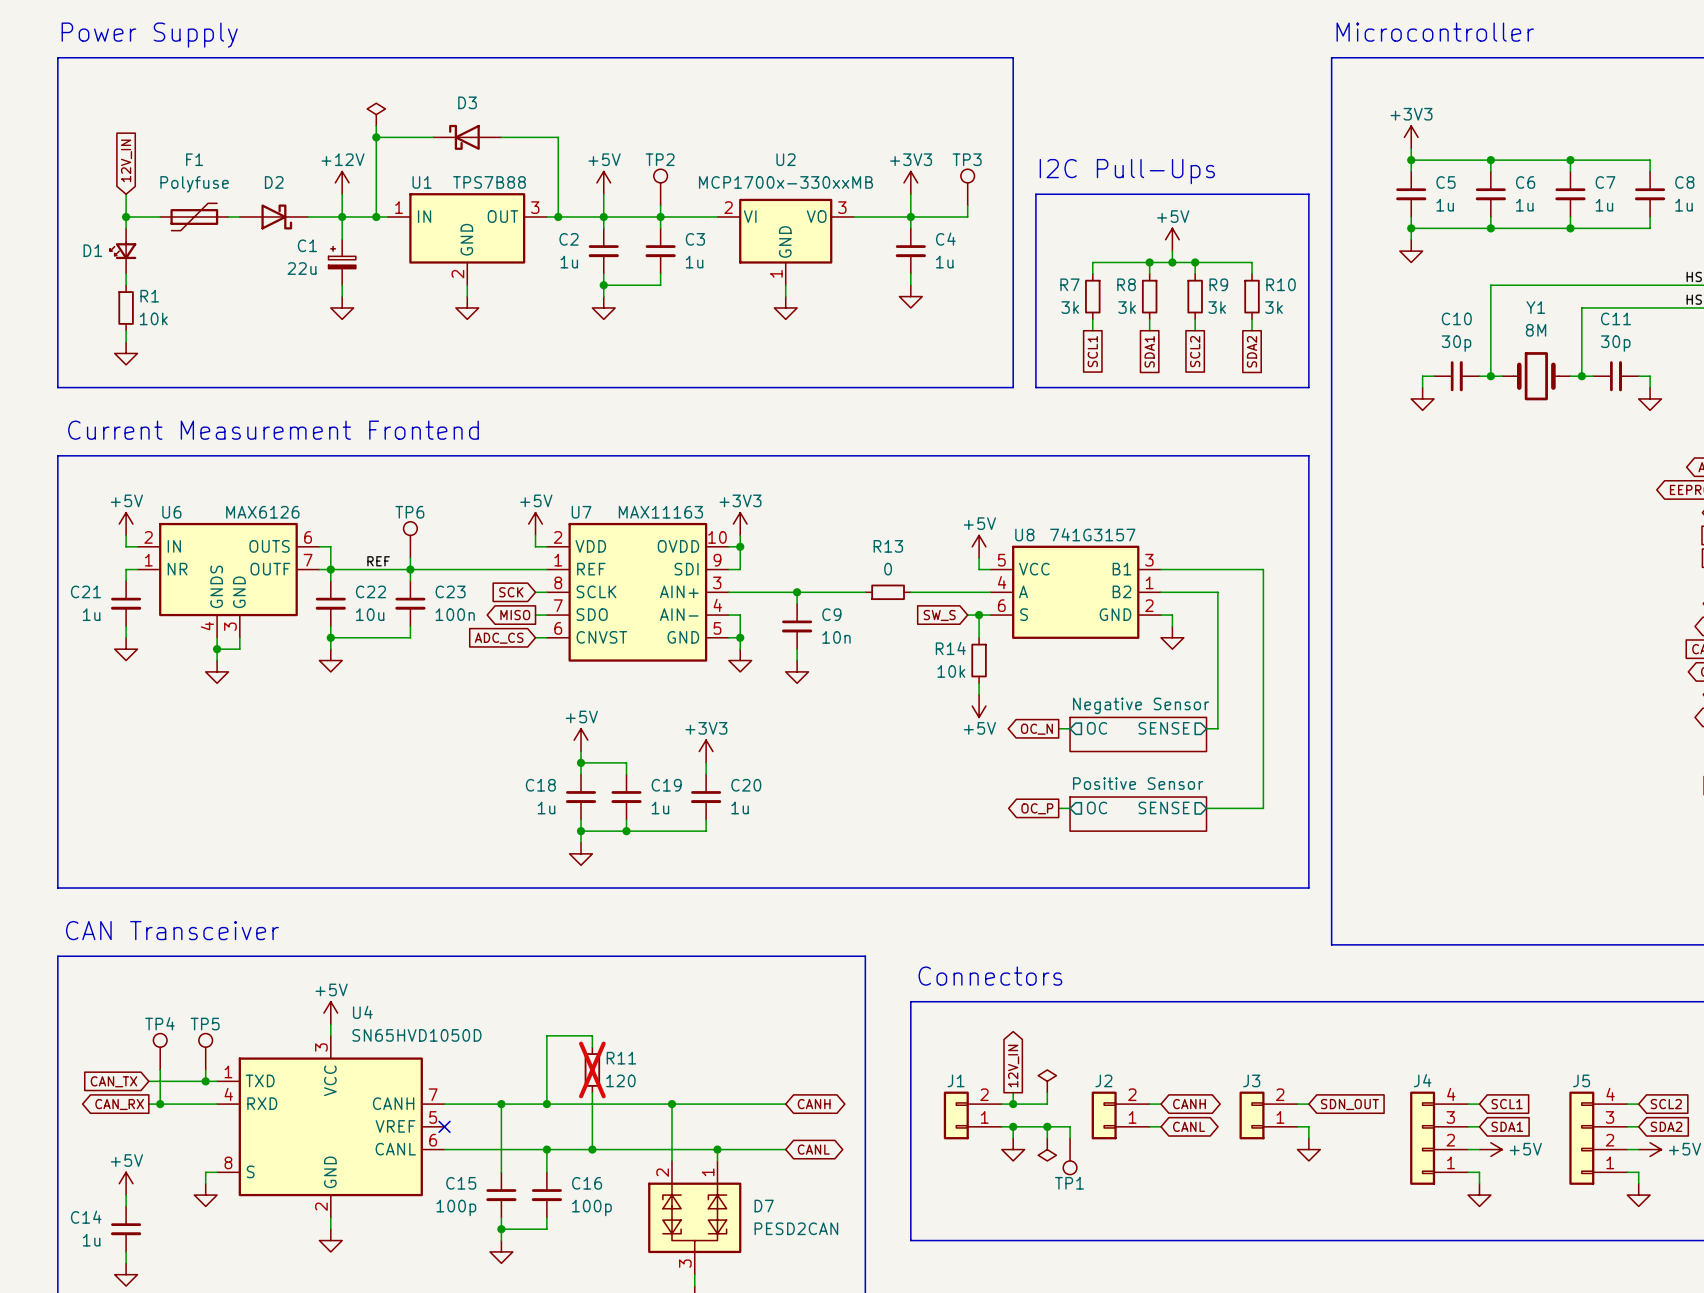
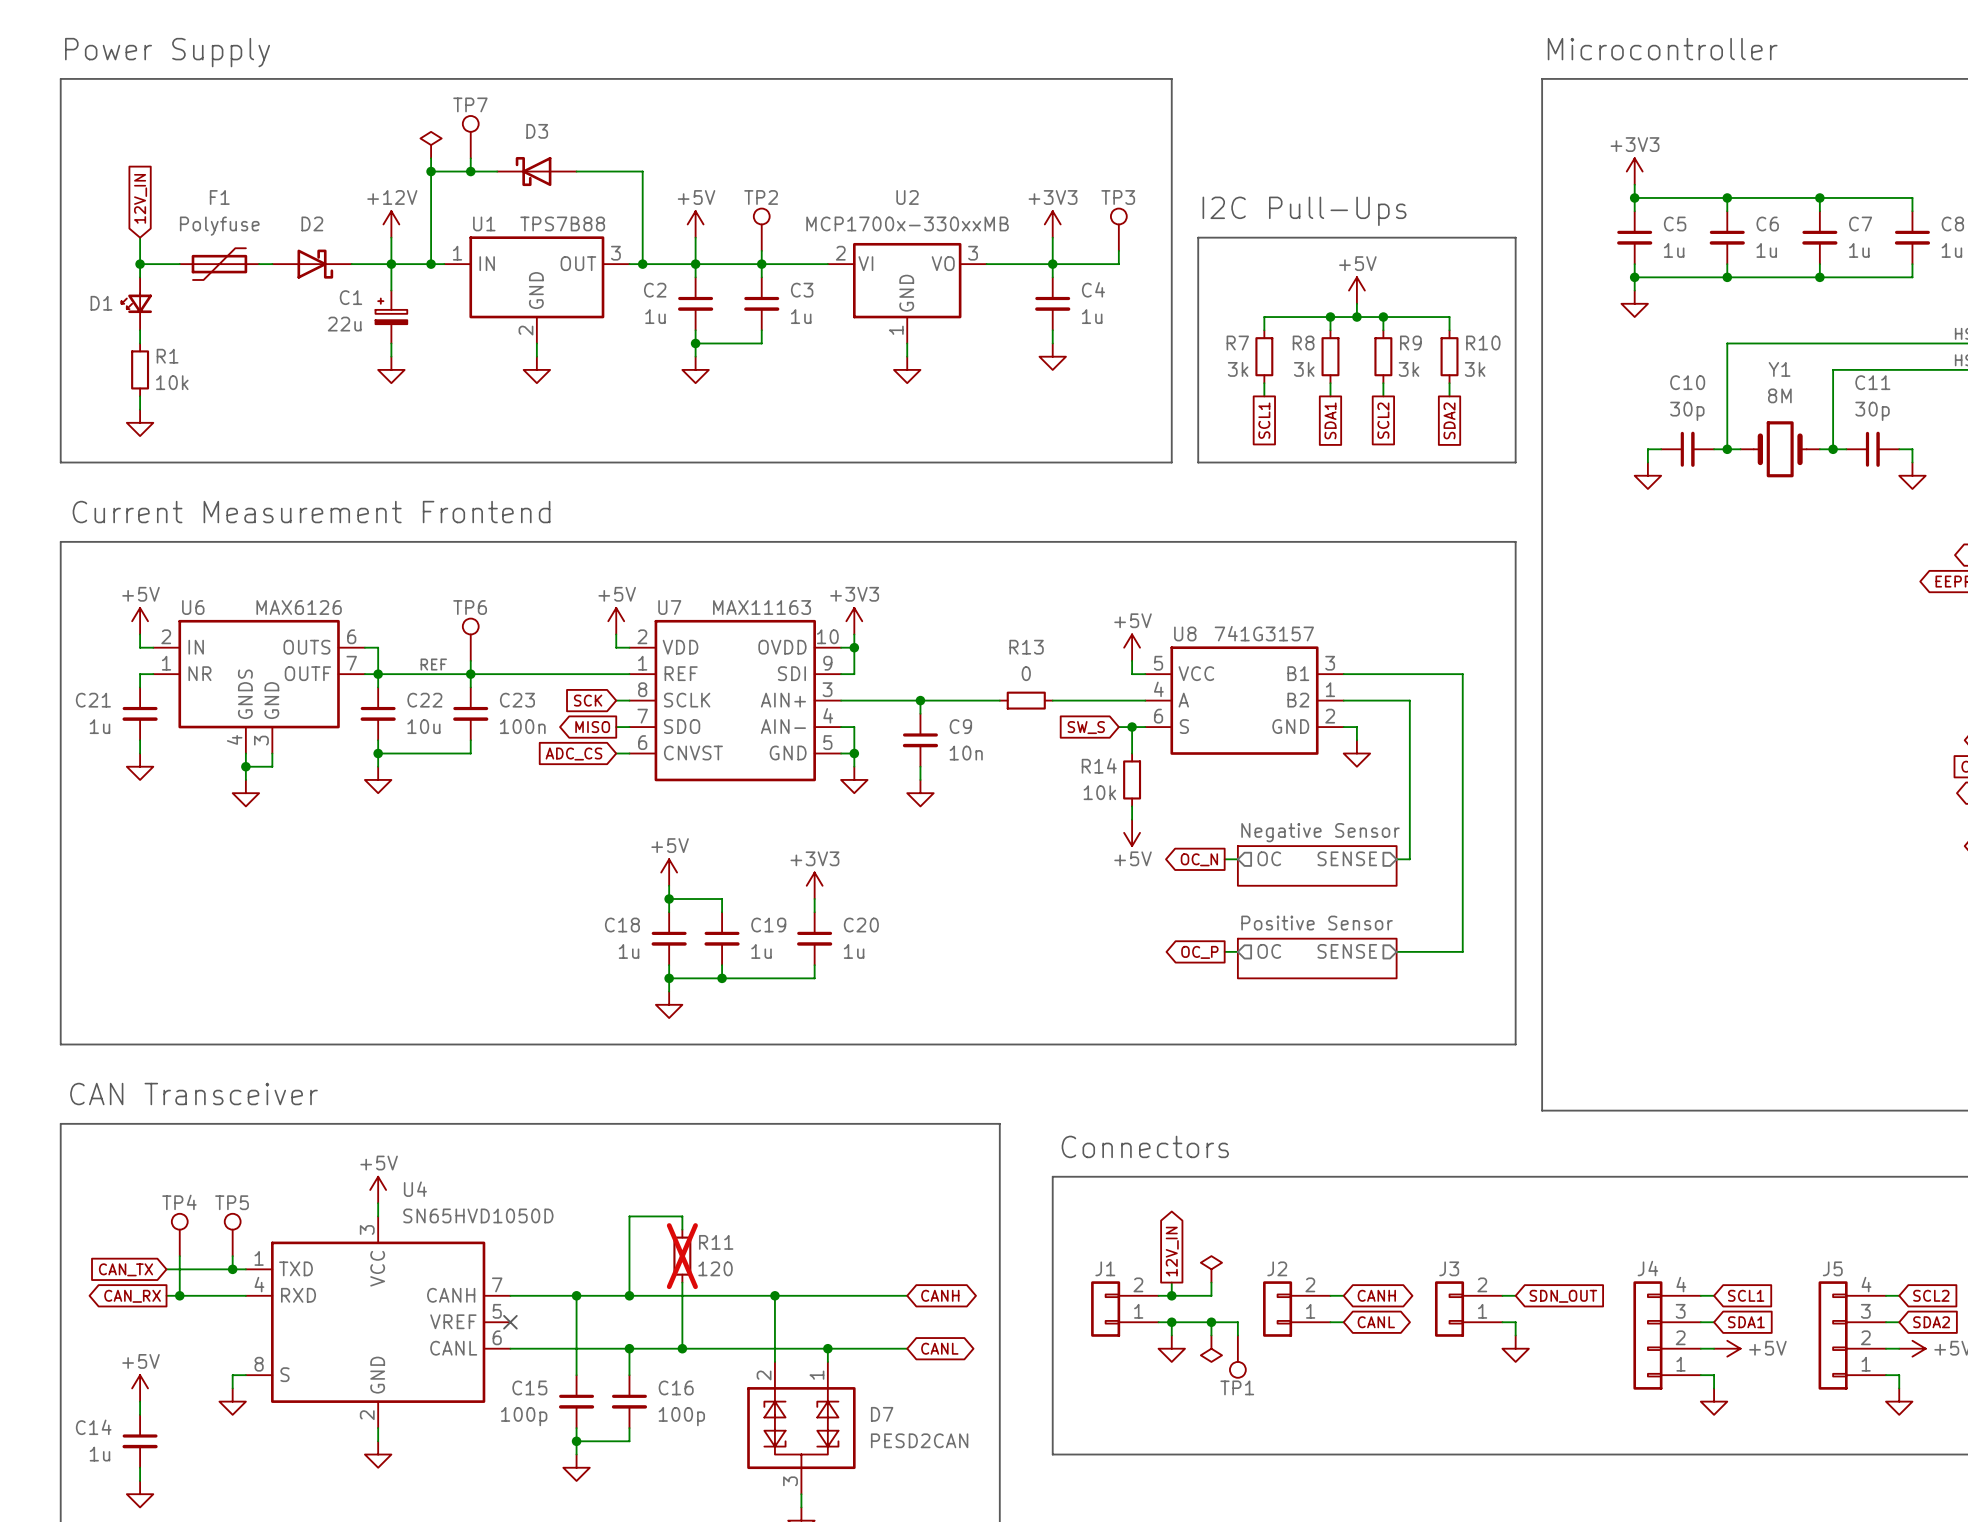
TP7: none -> (470, 137)
wire: none -> (470, 158) (470, 171)
junction: none -> (470, 171)

